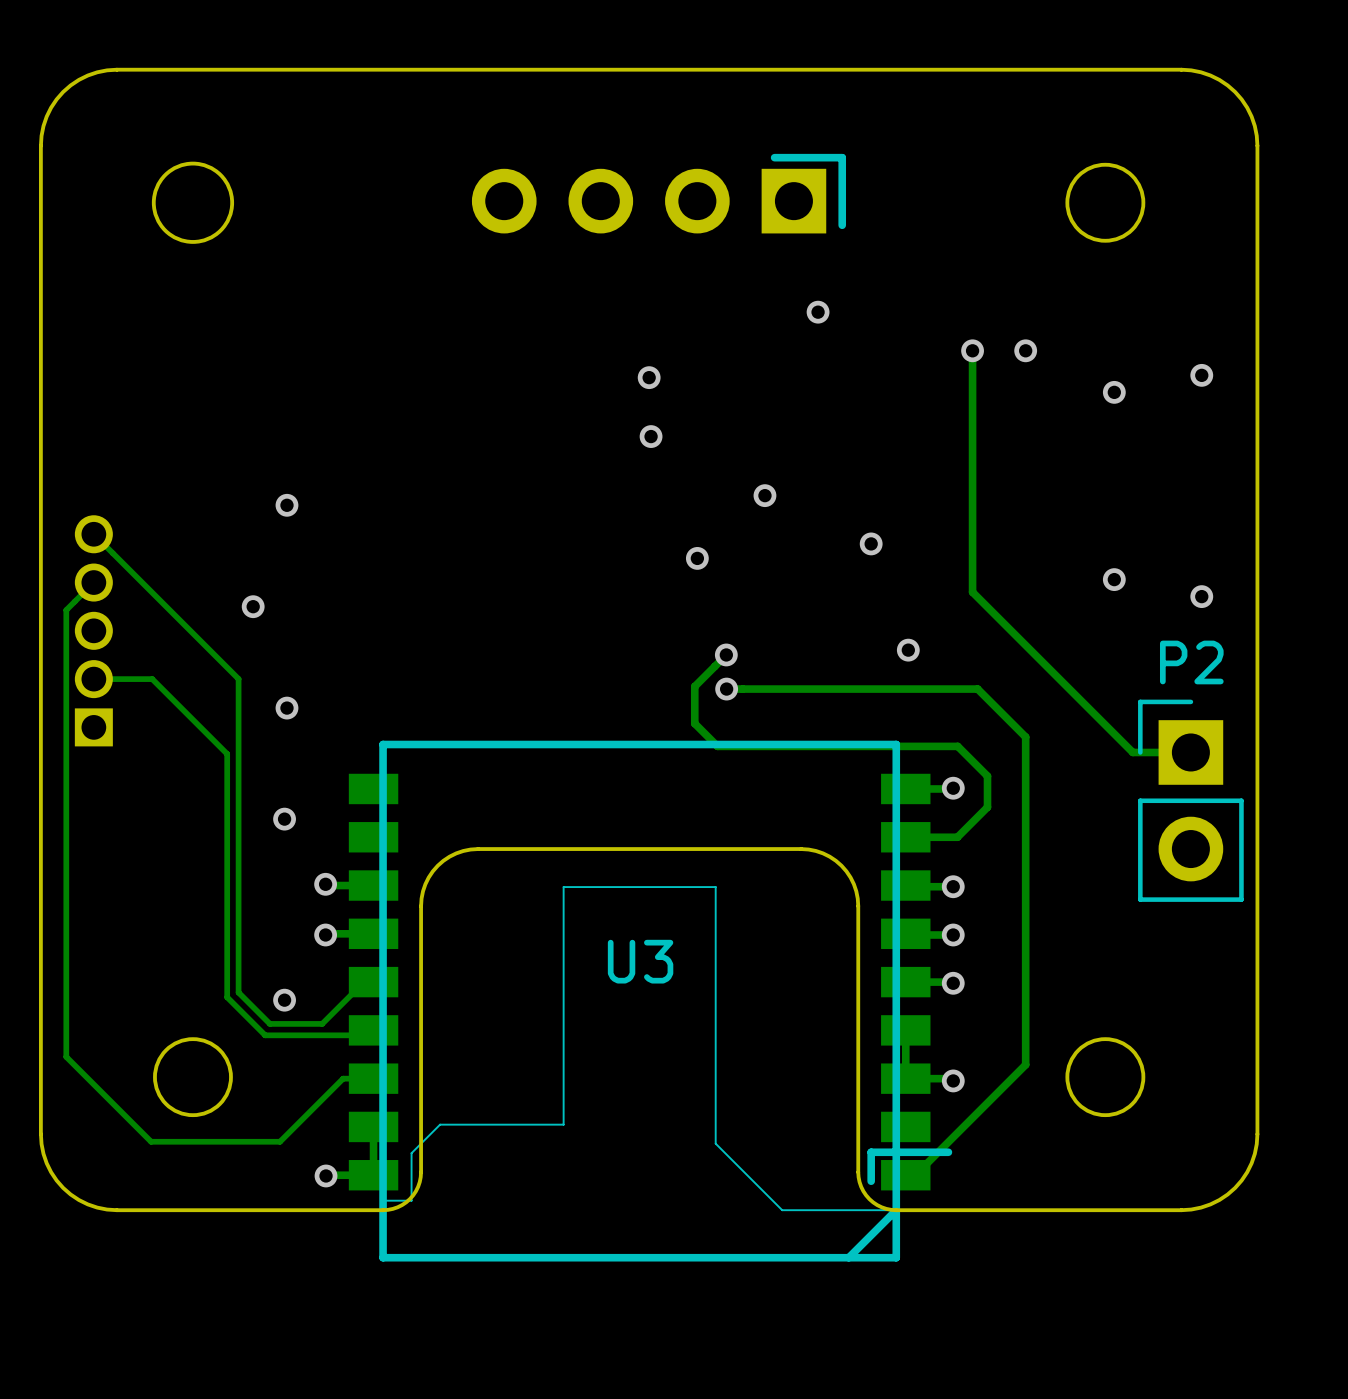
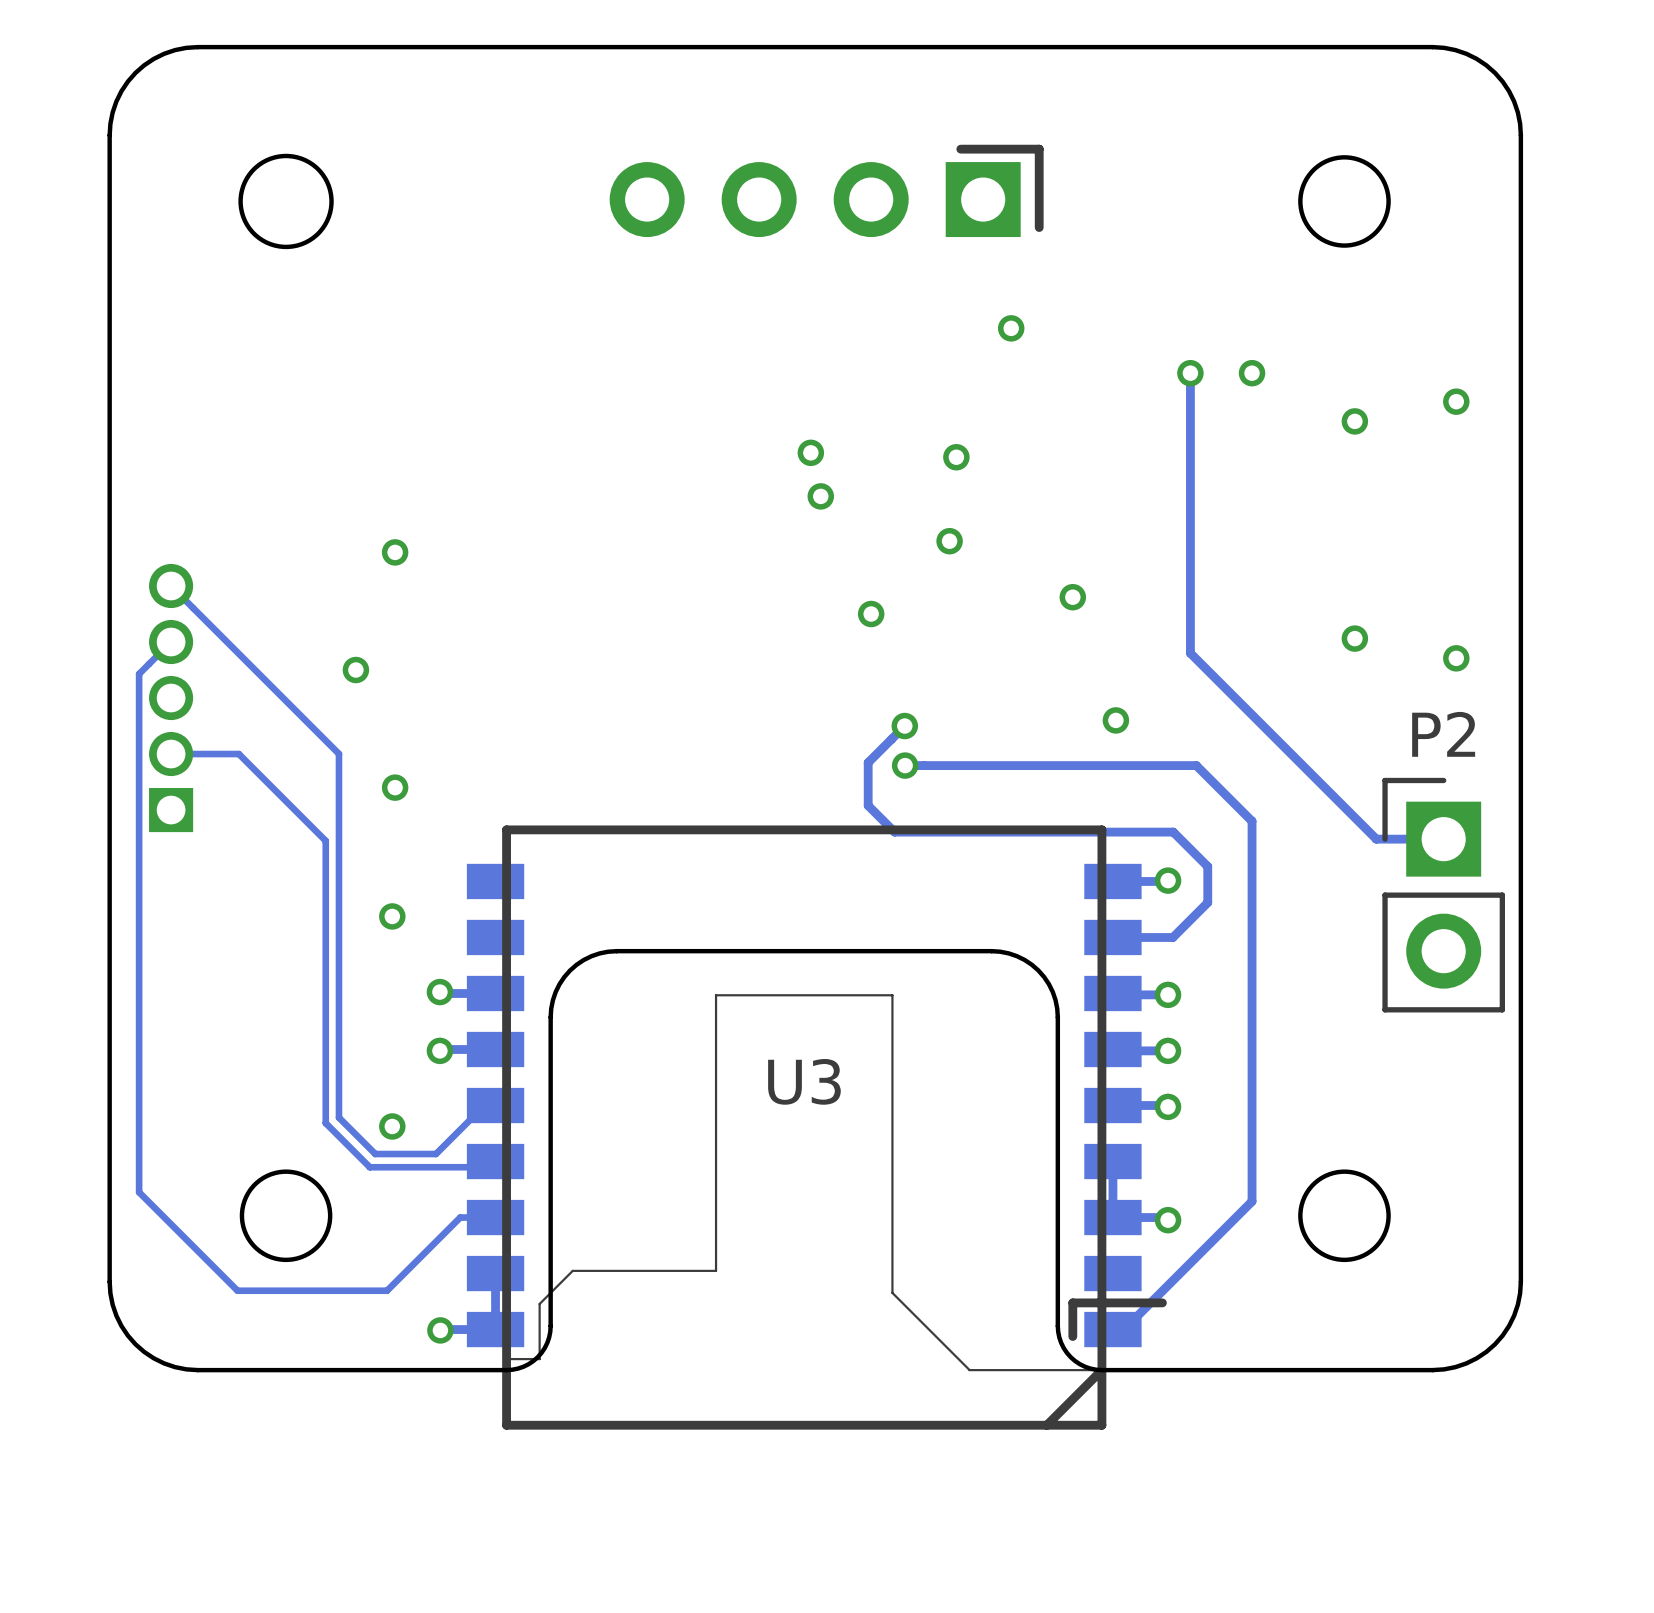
via: (649, 377) -> none
via: none -> (810, 452)
via: none -> (956, 457)
via: (651, 436) -> none
via: none -> (820, 496)

